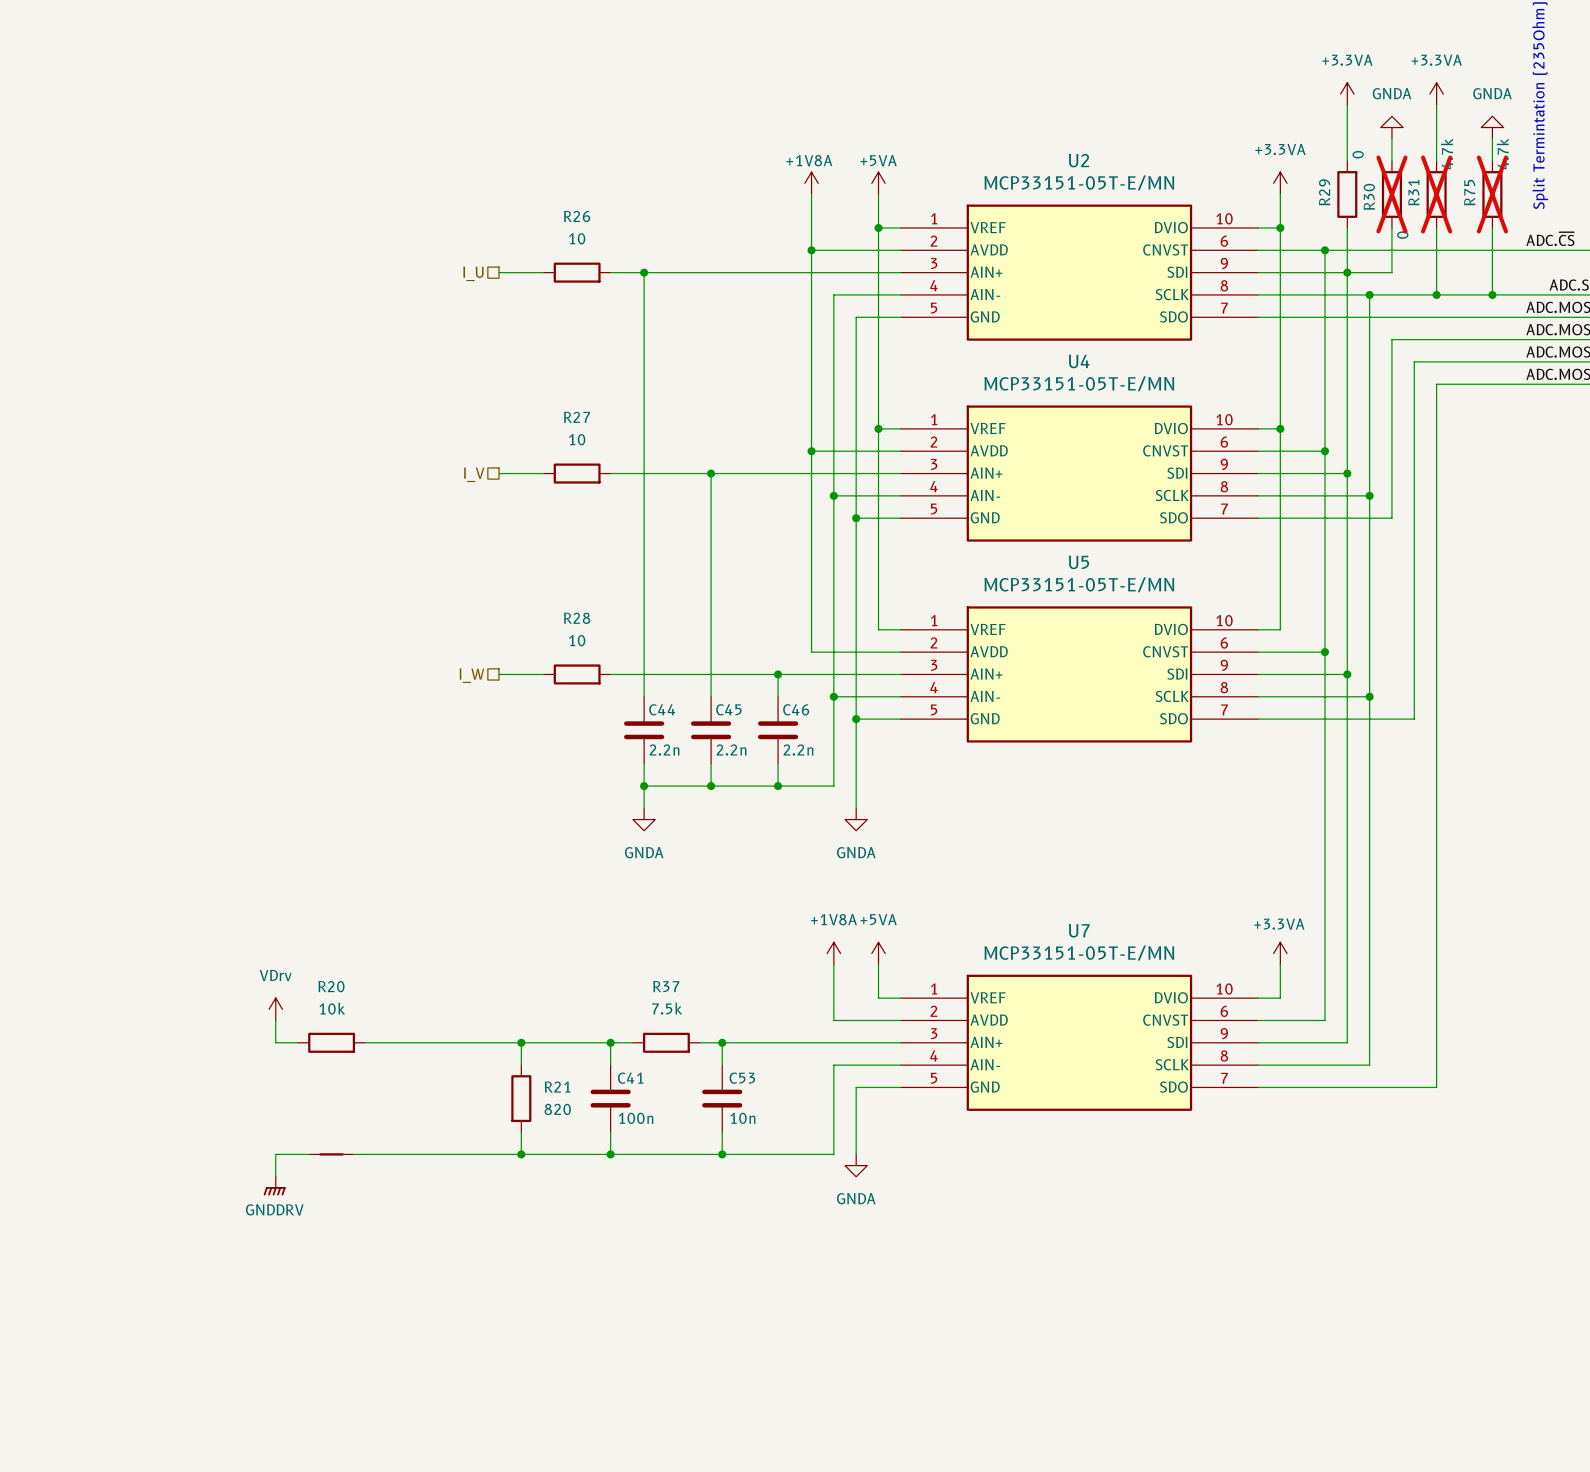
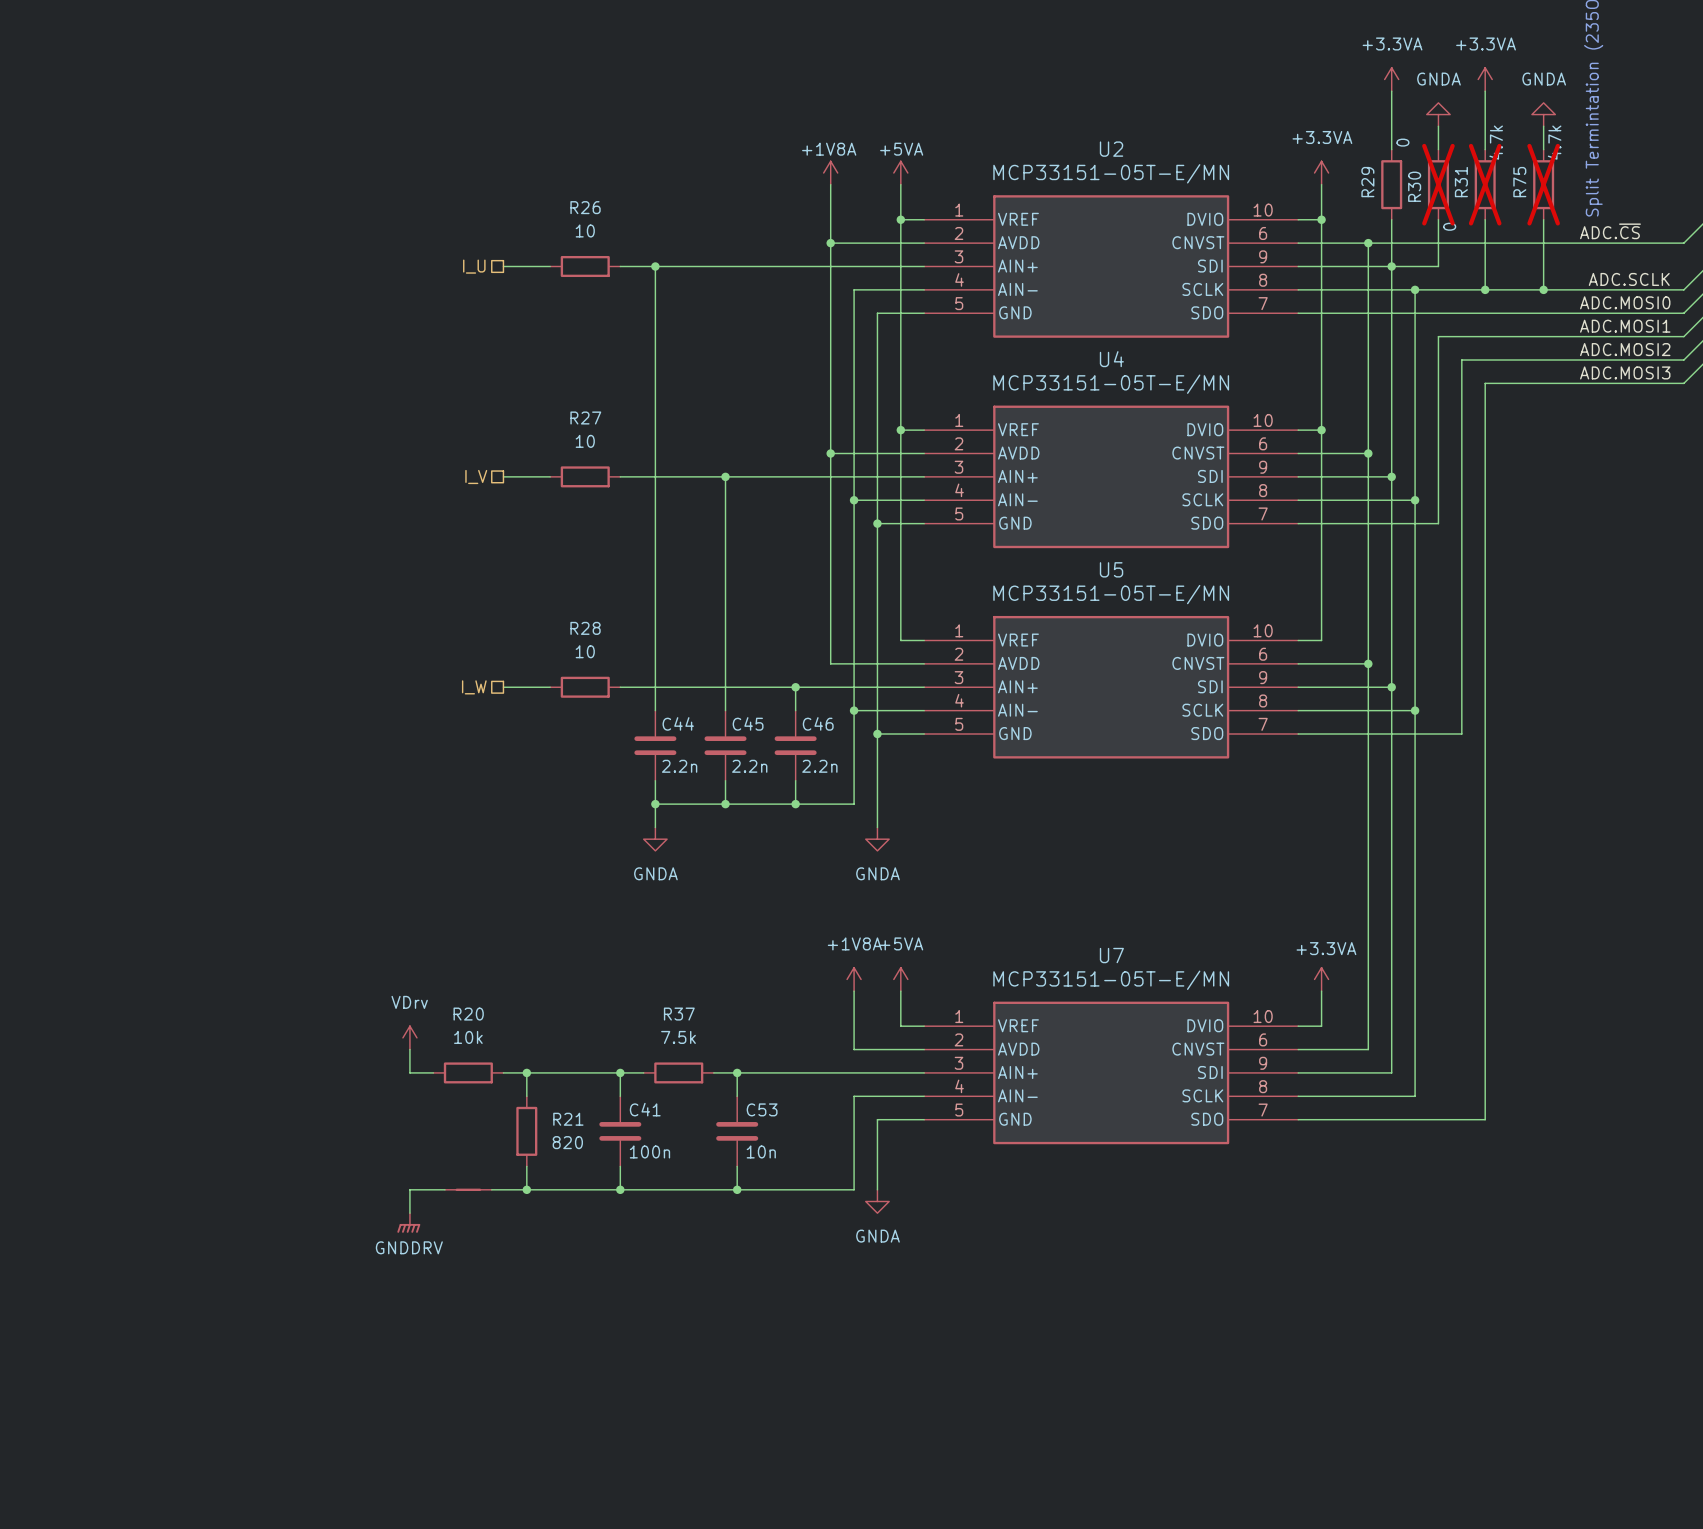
power symbol position: VDrv (275, 1009) -> VDrv (409, 1037)
wire: (275, 1020) (275, 1042) (298, 1042) -> none
R20 position: (331, 1042) -> (468, 1072)
wire: (365, 1042) (409, 1042) -> (409, 1049) (409, 1072)
wire: (432, 1042) (499, 1042) -> none
wire: (309, 1154) (275, 1154) (275, 1176) -> none
part position: (331, 1154) -> (468, 1189)
wire: (353, 1154) (409, 1154) -> (409, 1213) (409, 1189)
power symbol position: GNDDRV (274, 1186) -> GNDDRV (408, 1223)

